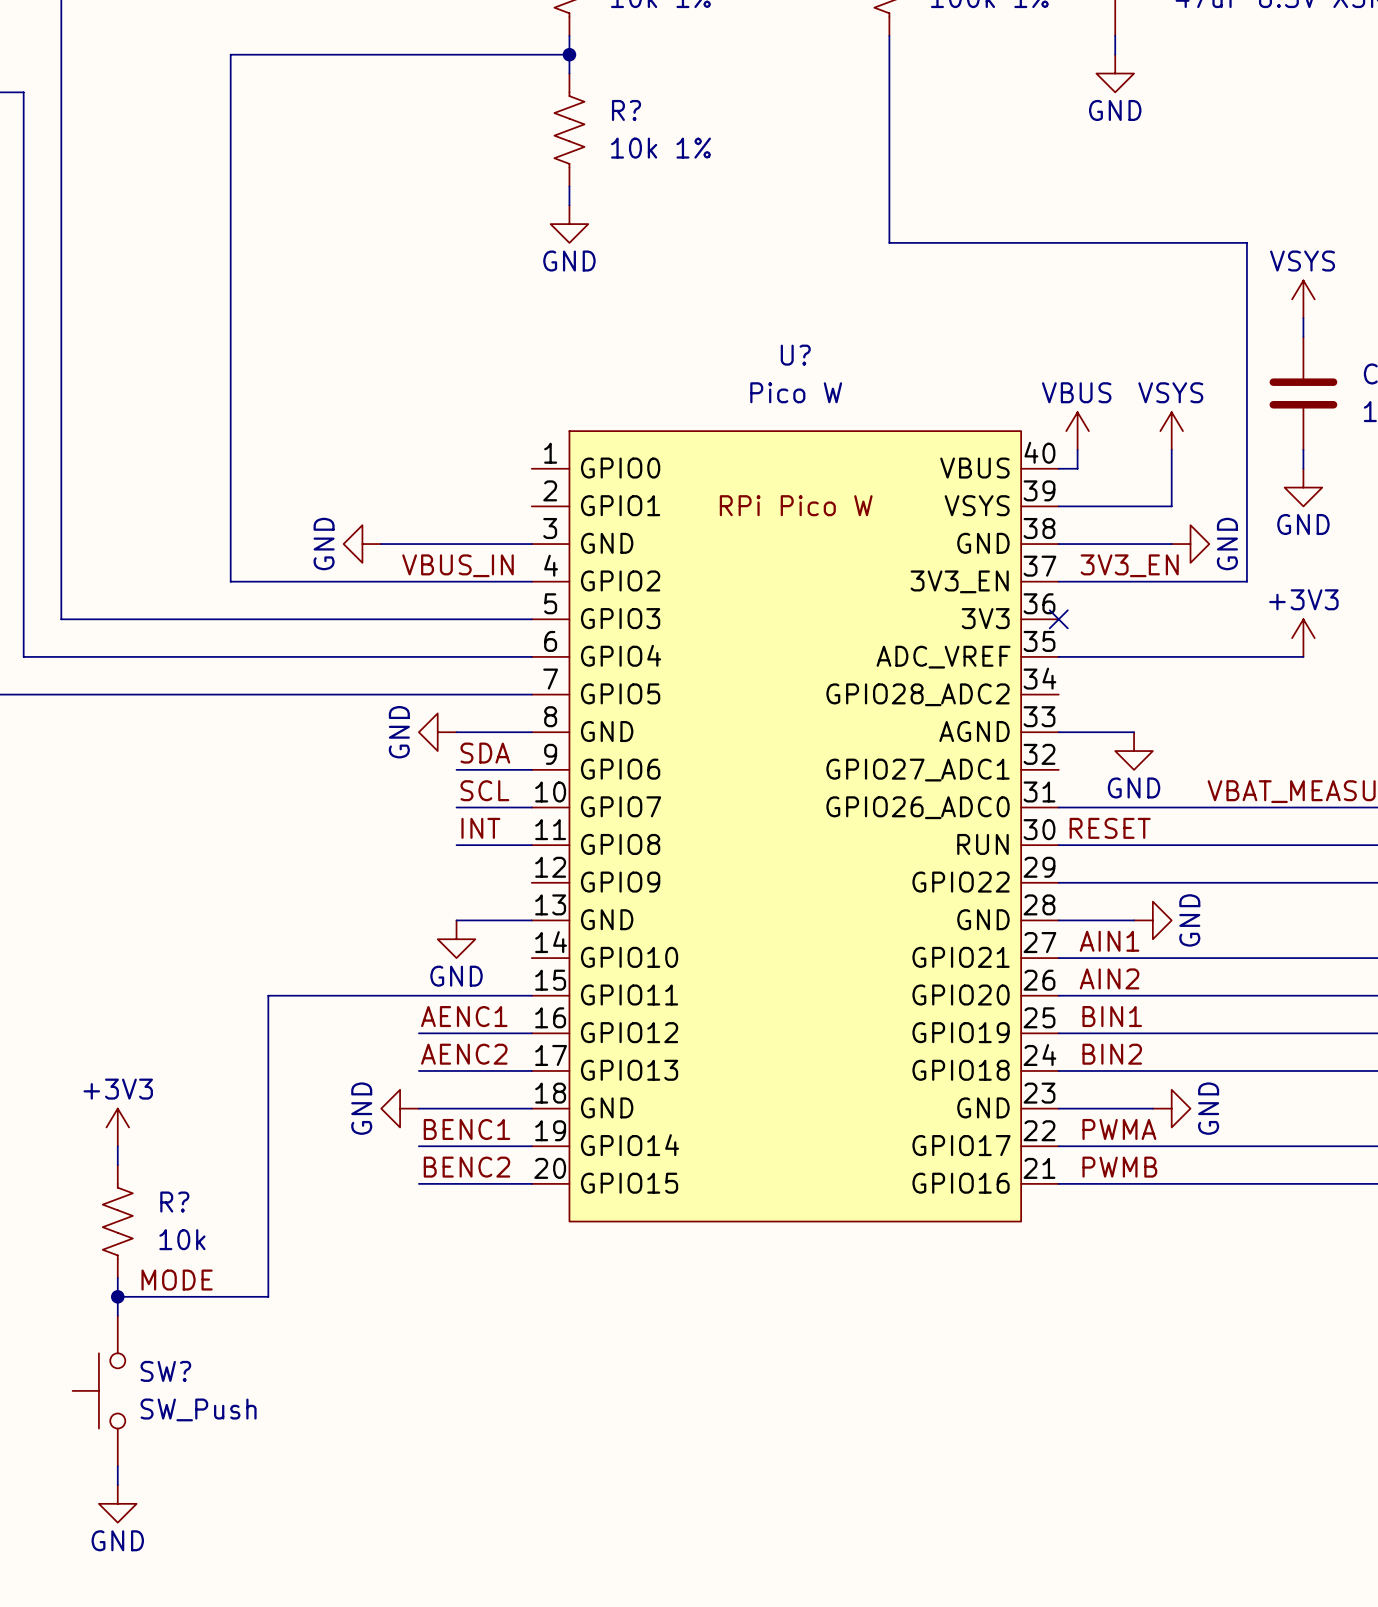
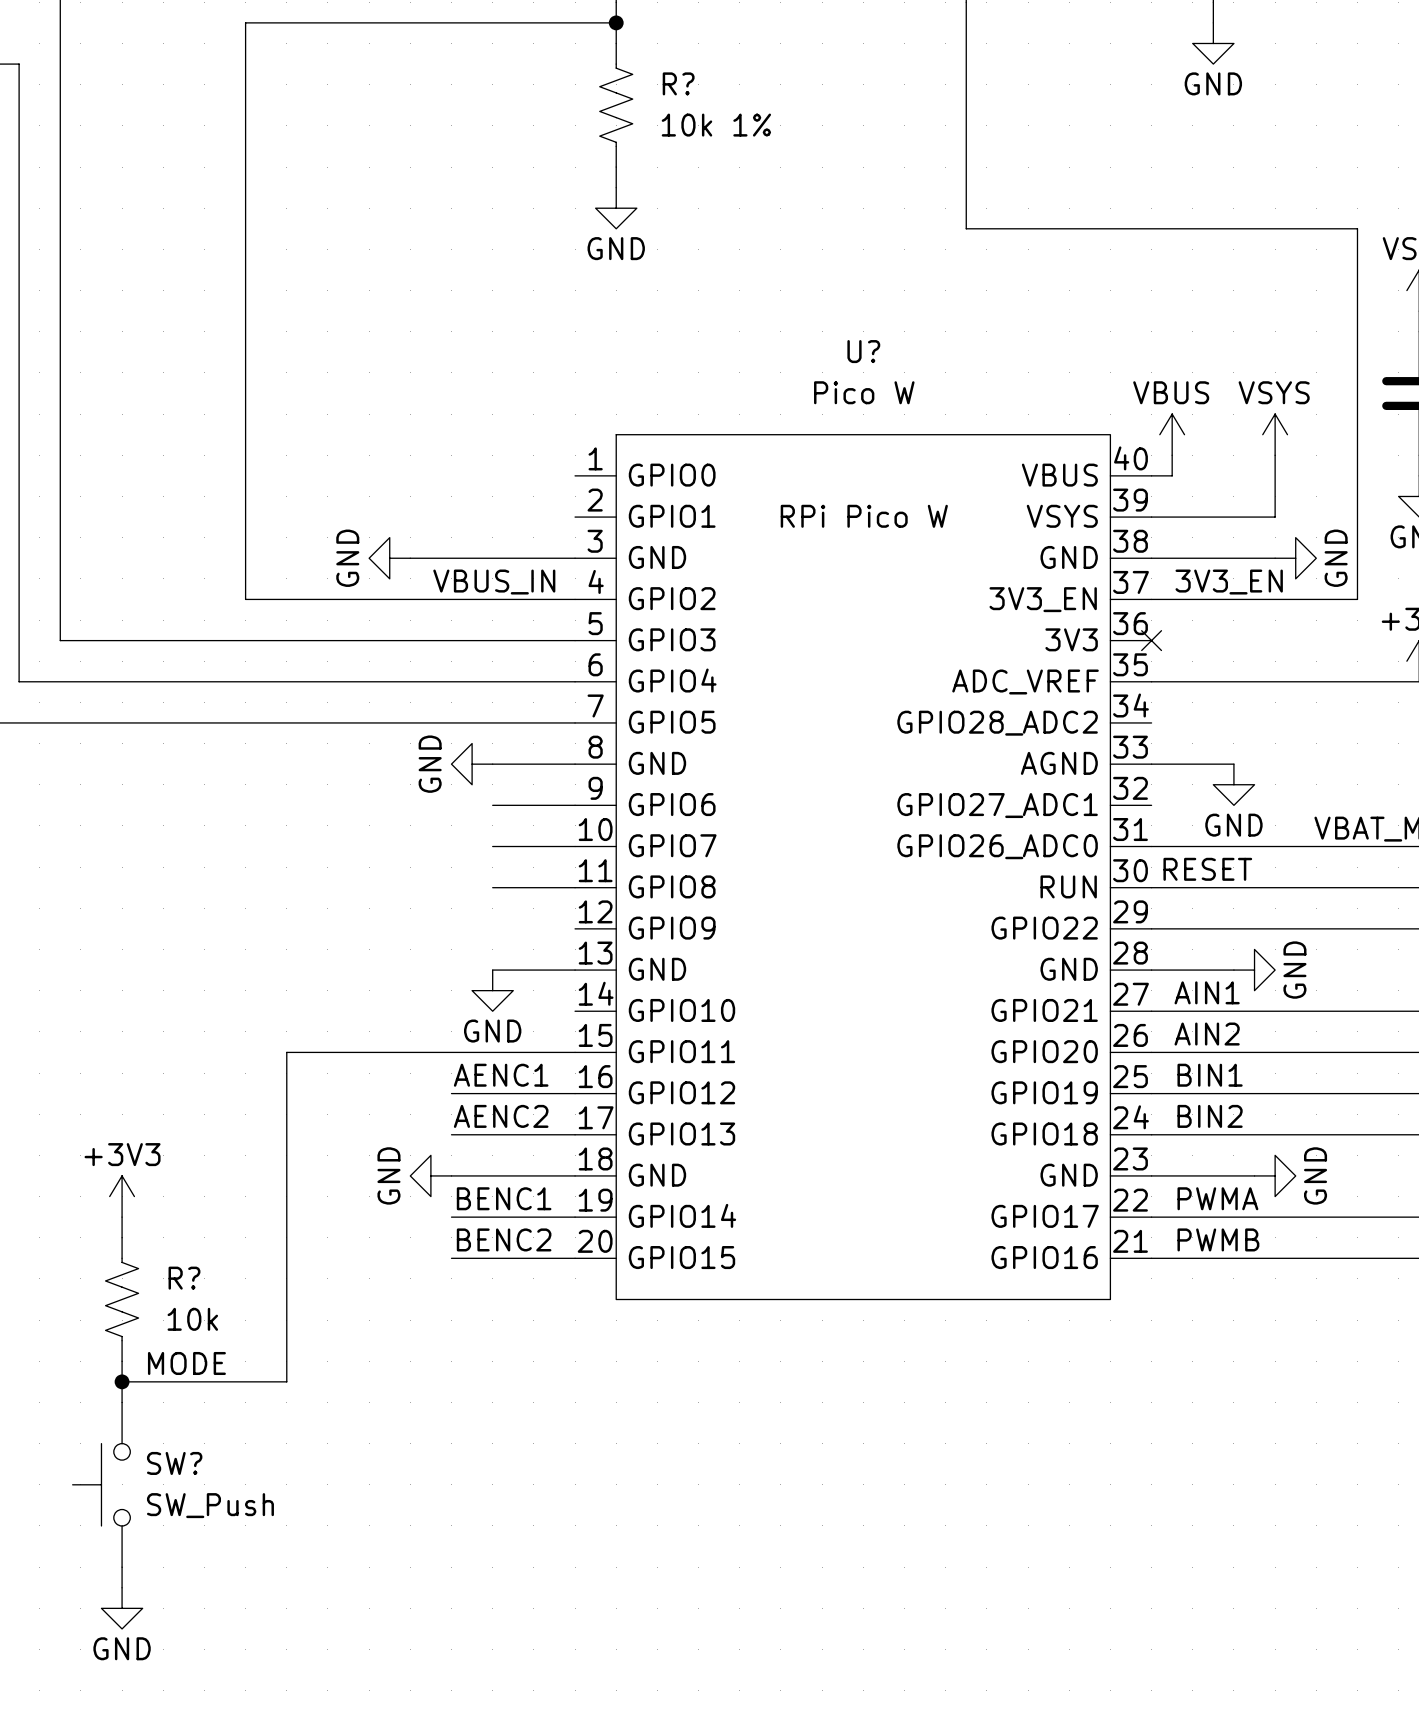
label: SDA (485, 753) -> none
label: SCL (484, 790) -> none
label: INT (480, 828) -> none

